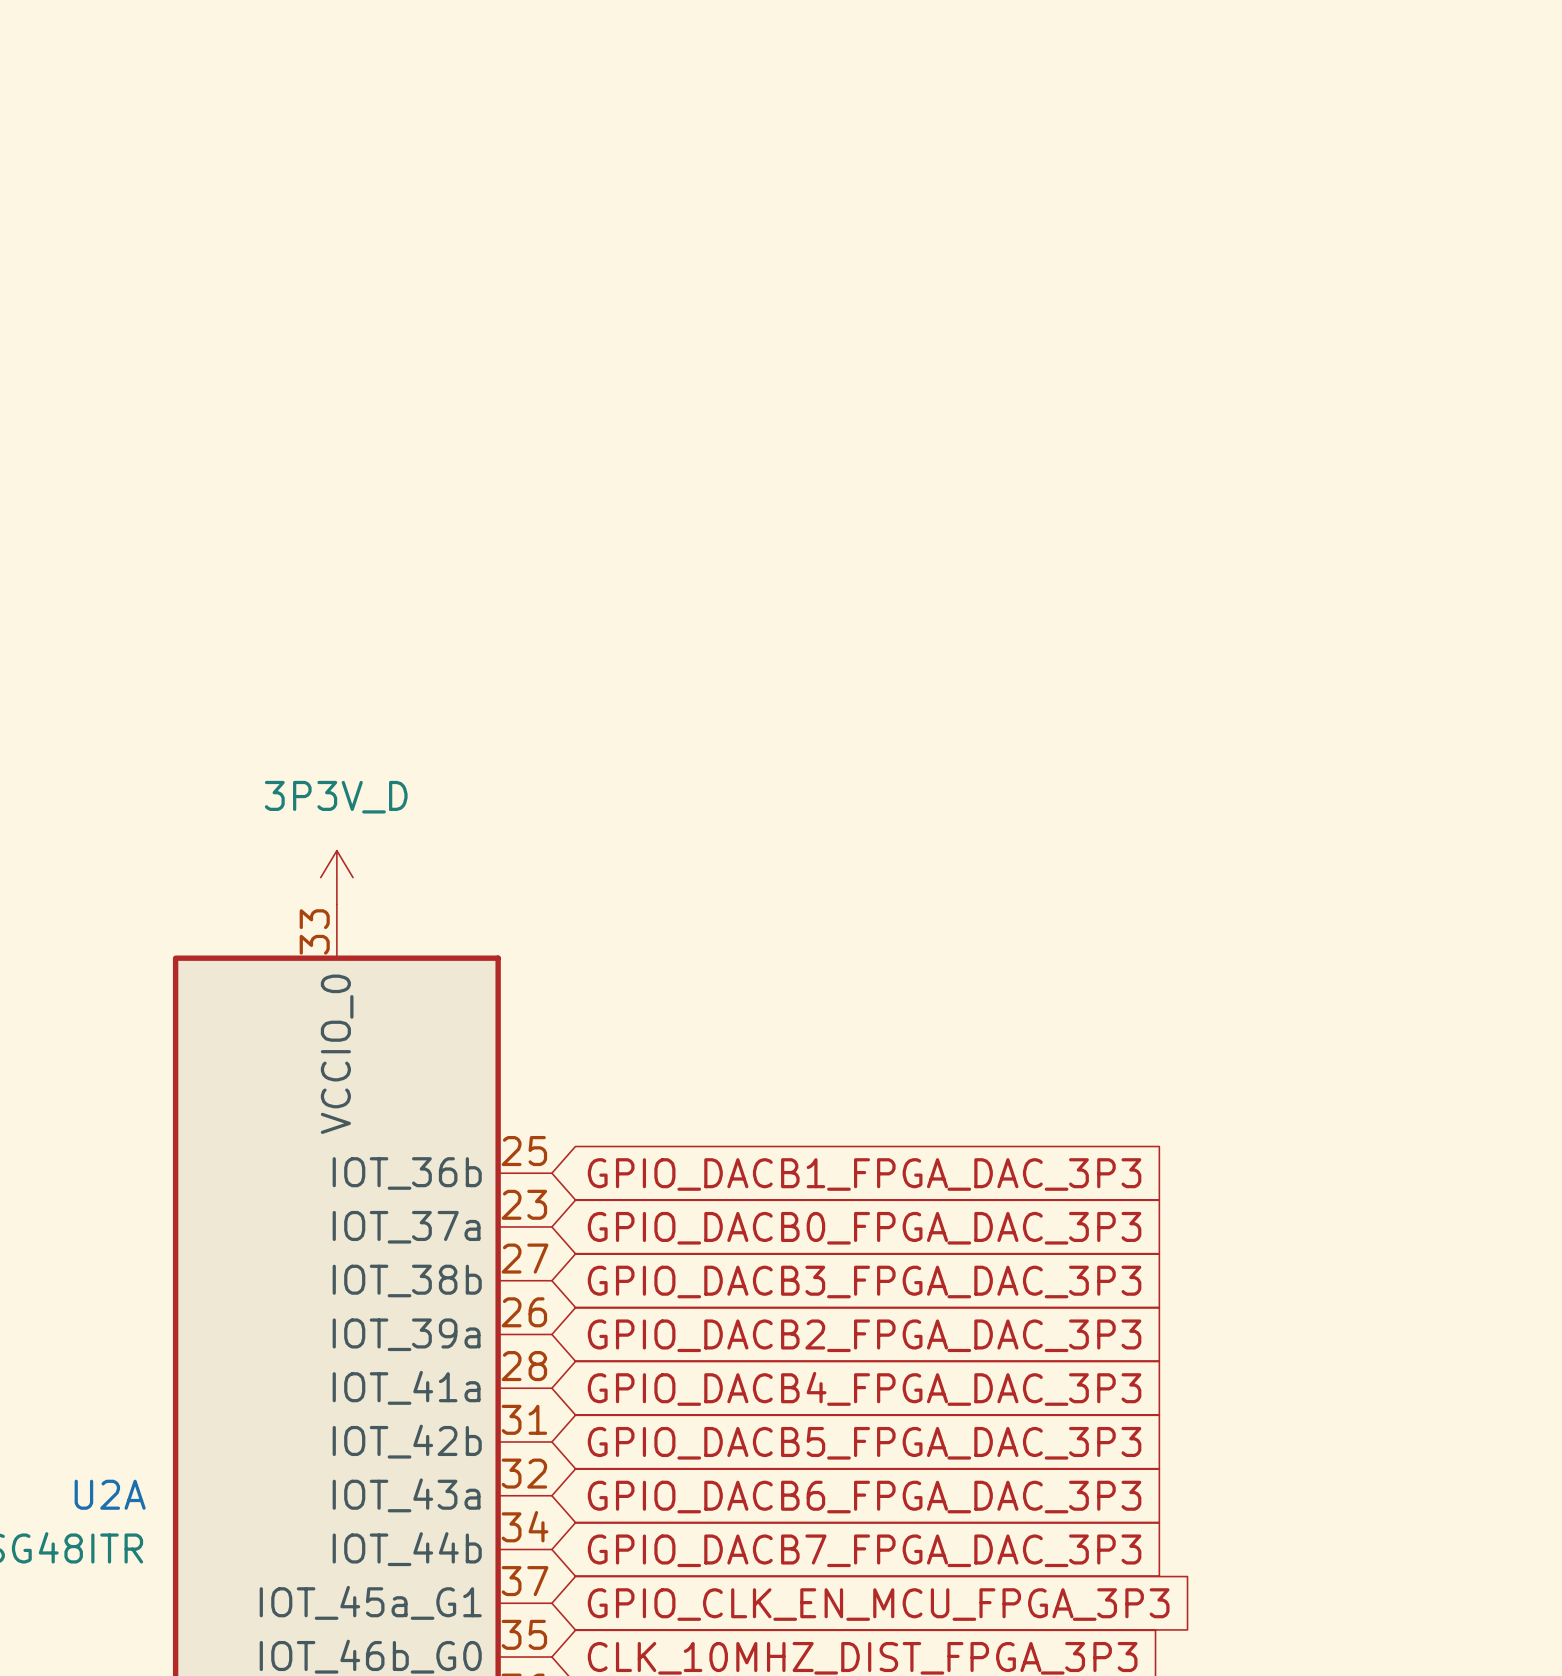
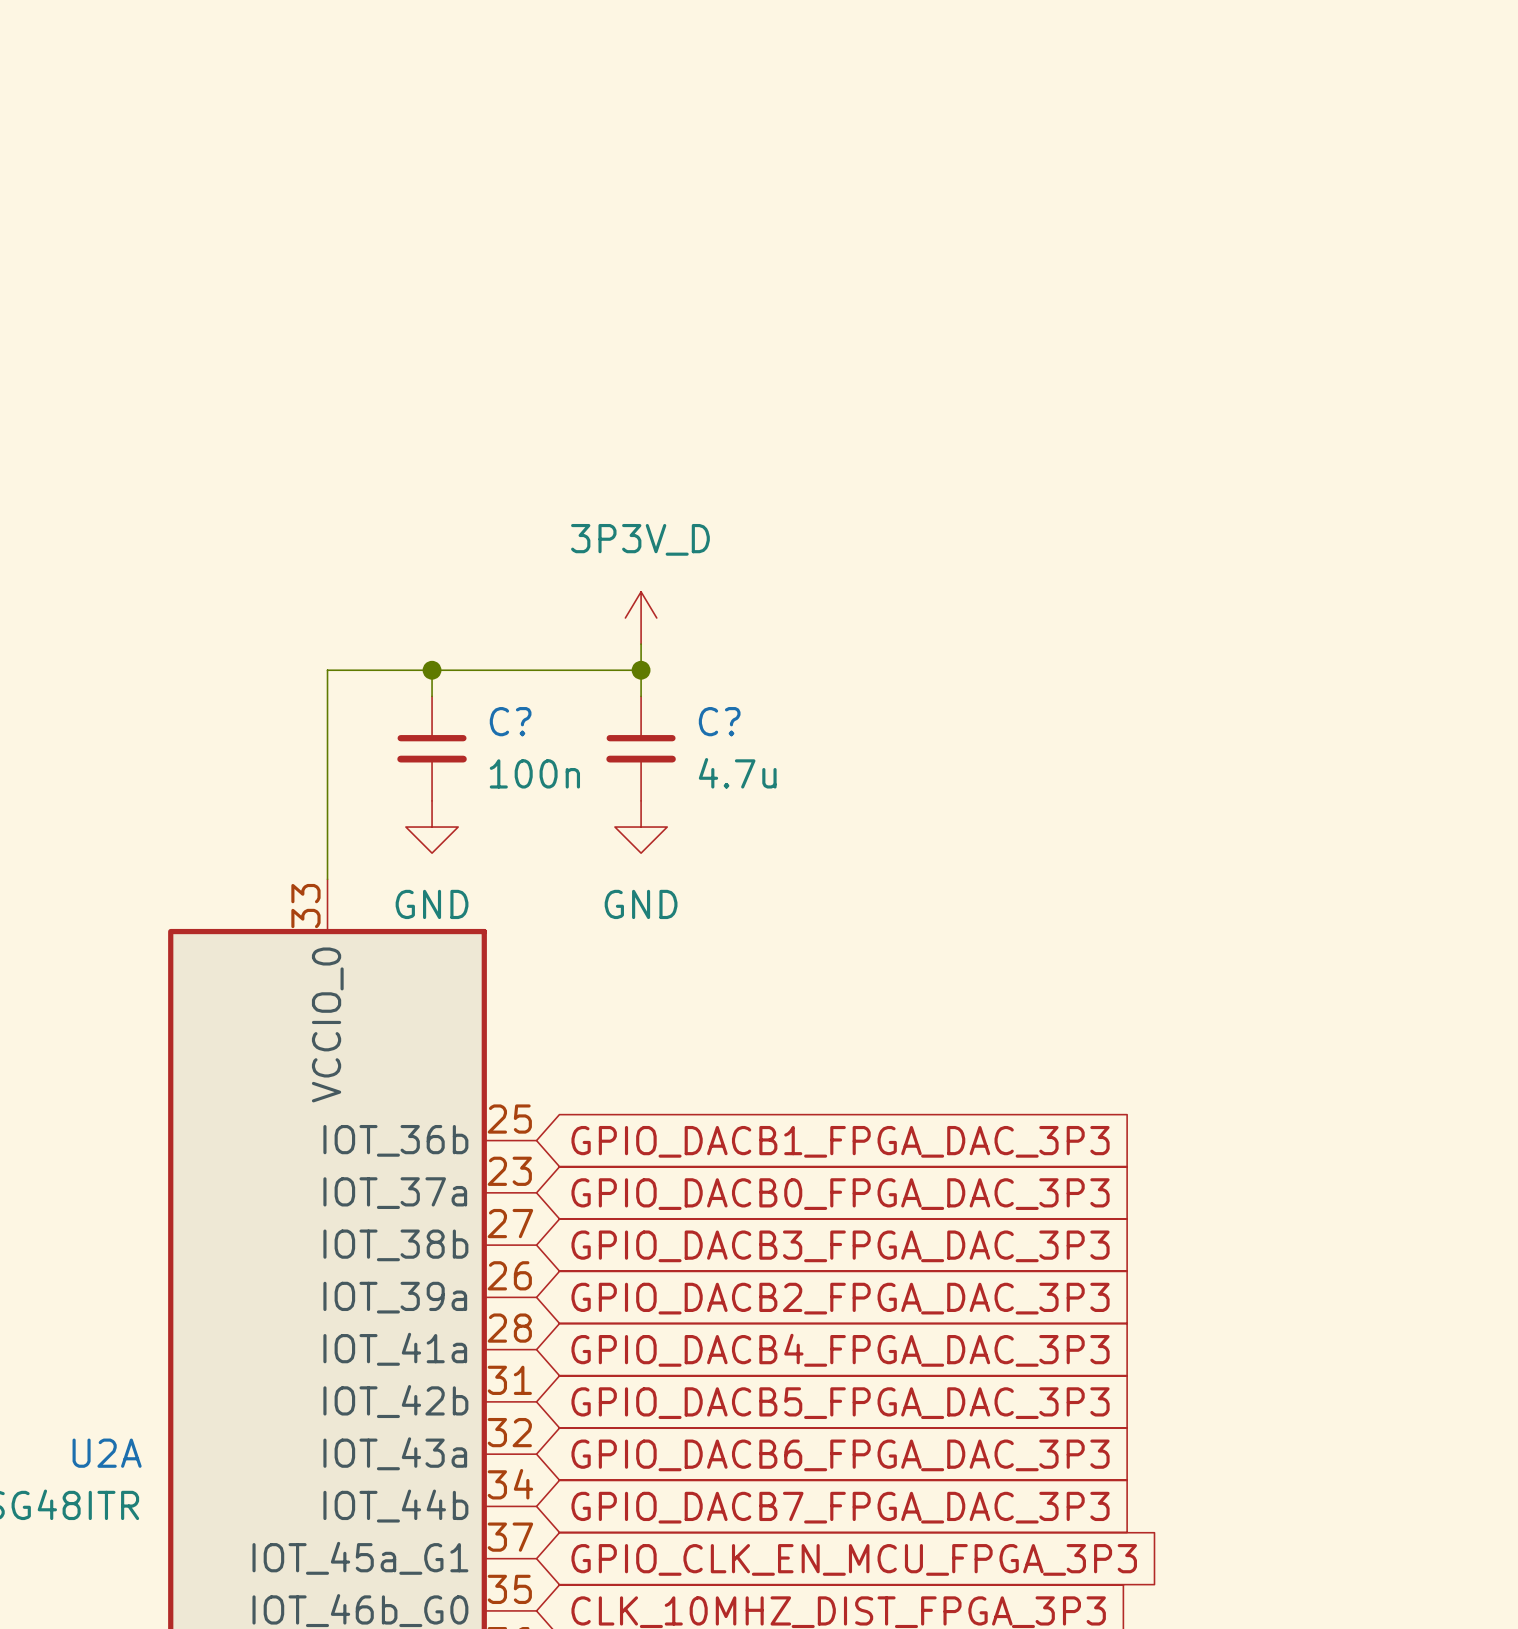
wire: none -> (641, 644) (641, 696)
wire: none -> (432, 670) (432, 696)
junction: none -> (432, 670)
wire: none -> (641, 670) (327, 670) (327, 879)
junction: none -> (641, 670)
C?: none -> 100n (432, 748)
C?: none -> 4.7u (641, 748)
power symbol: none -> GND (432, 827)
power symbol: none -> GND (641, 827)
power symbol position: 3P3V_D (336, 877) -> 3P3V_D (641, 617)

